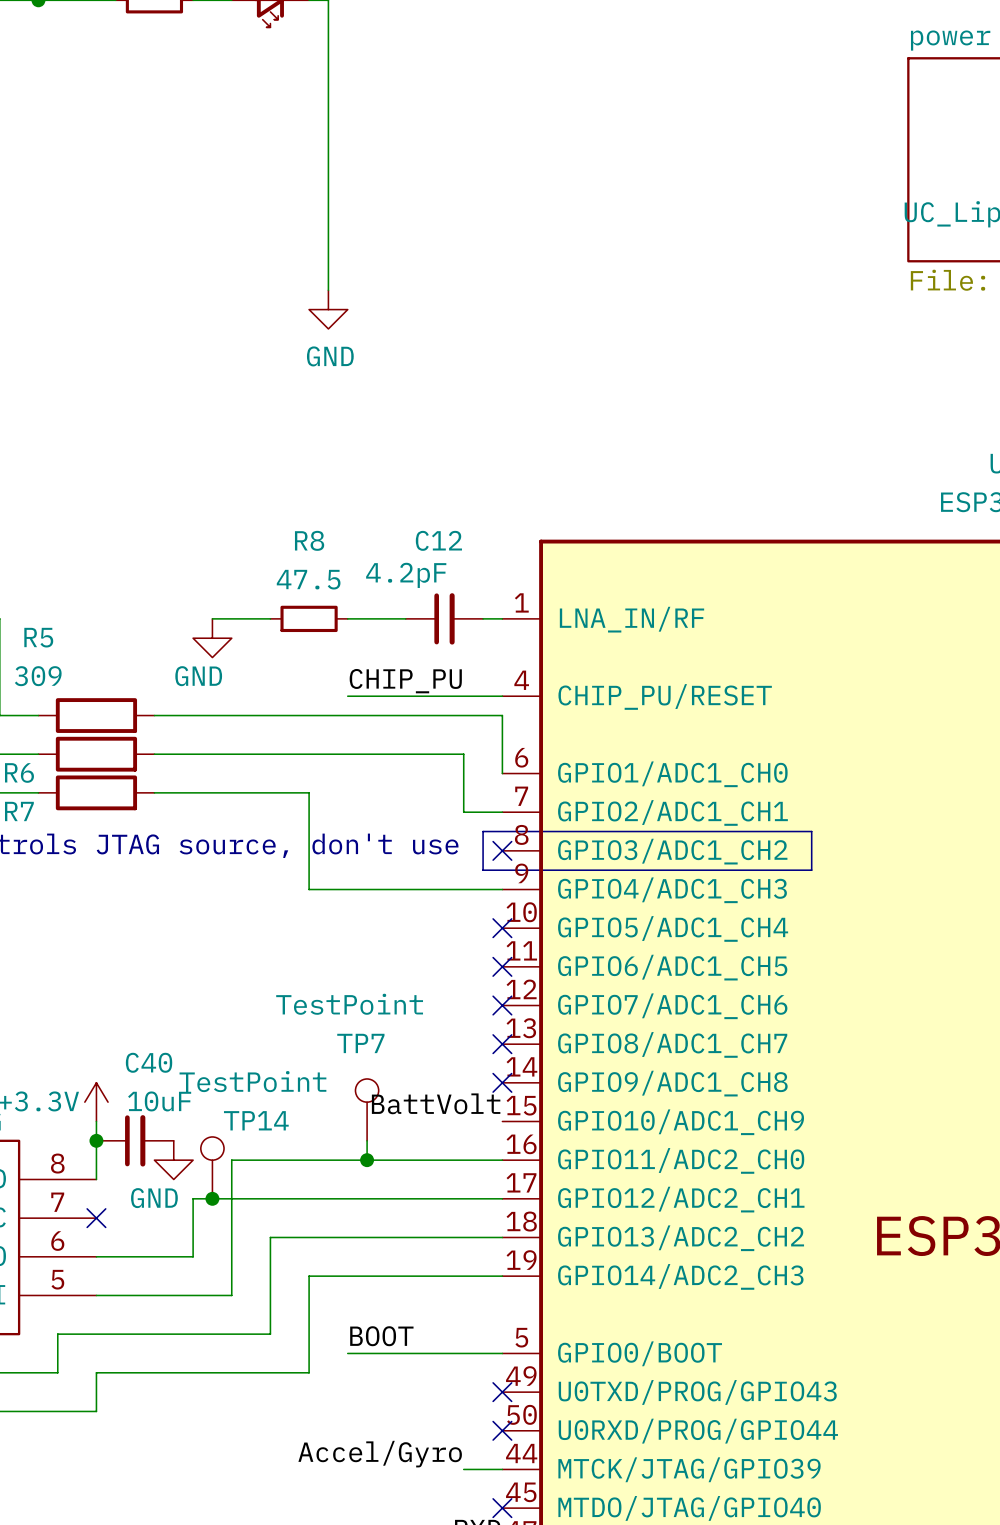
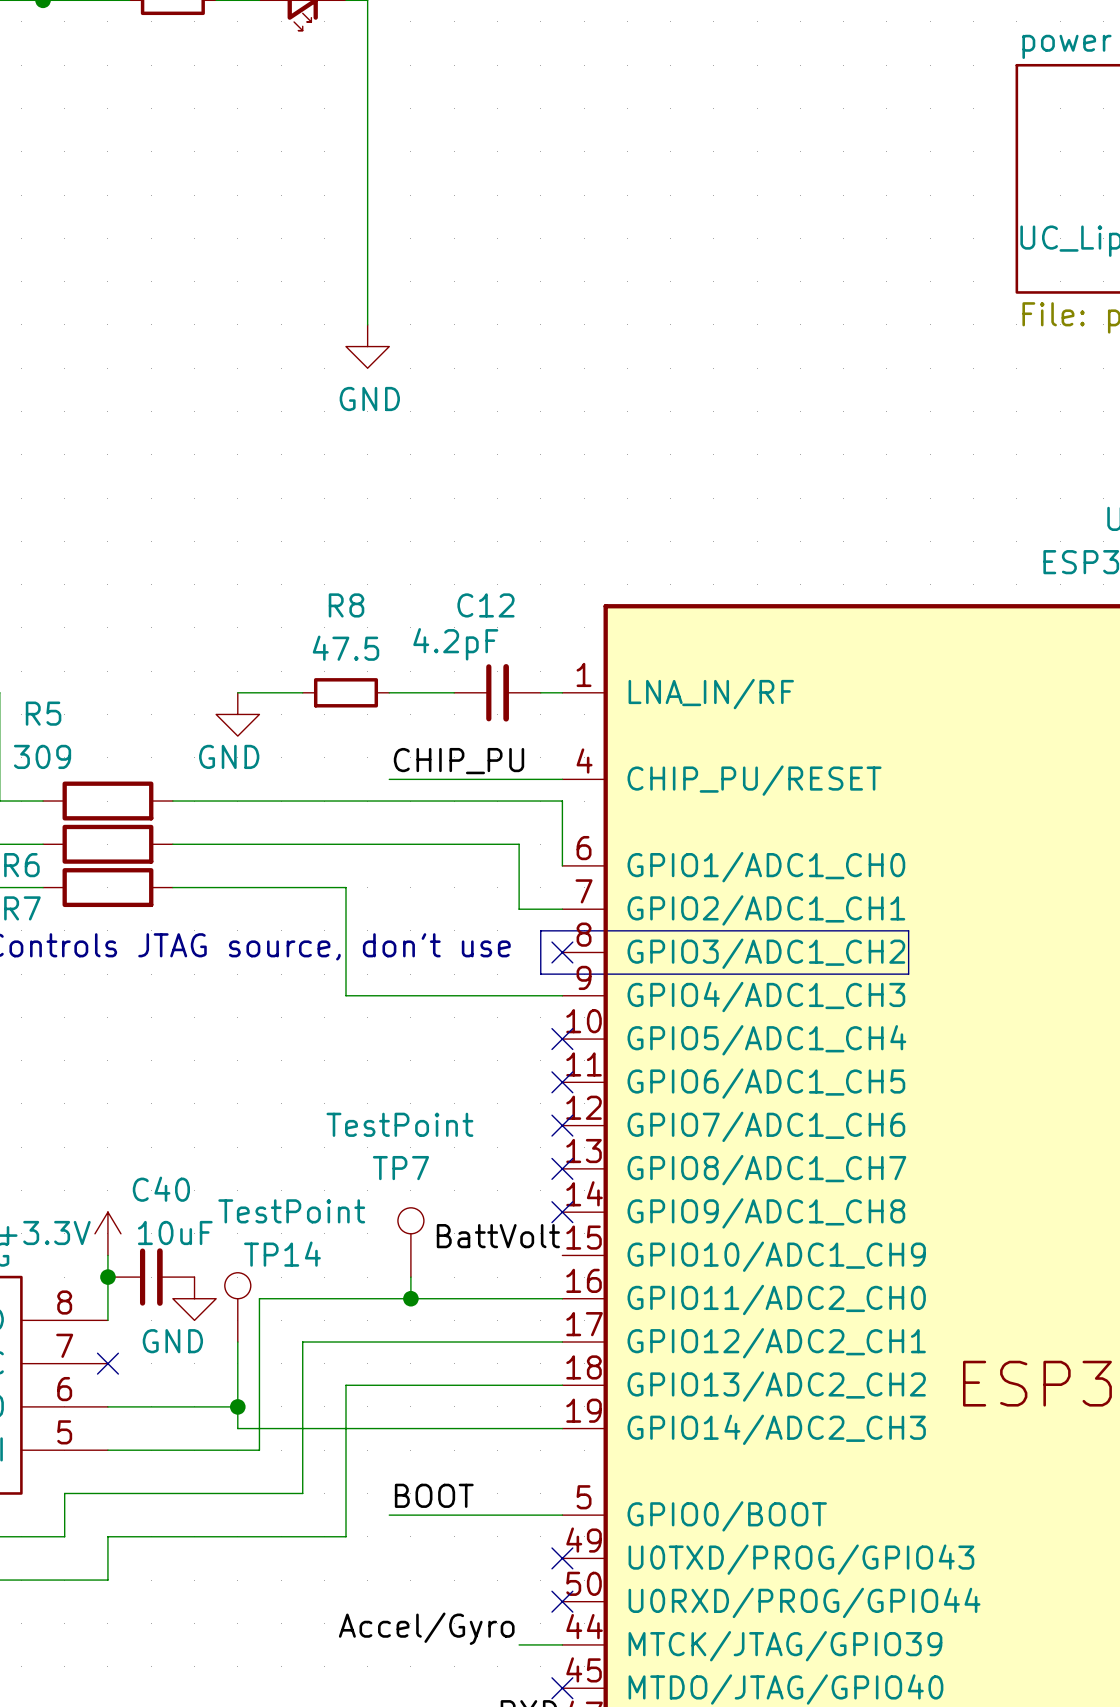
wire: none -> (237, 1342) (237, 1428) (346, 1428) (346, 1385)
junction position: (212, 1198) -> (237, 1406)
wire: (270, 1198) (193, 1198) (193, 1256) -> (237, 1406) (216, 1406)
wire: (270, 1237) (309, 1237) -> (302, 1385) (302, 1342)

